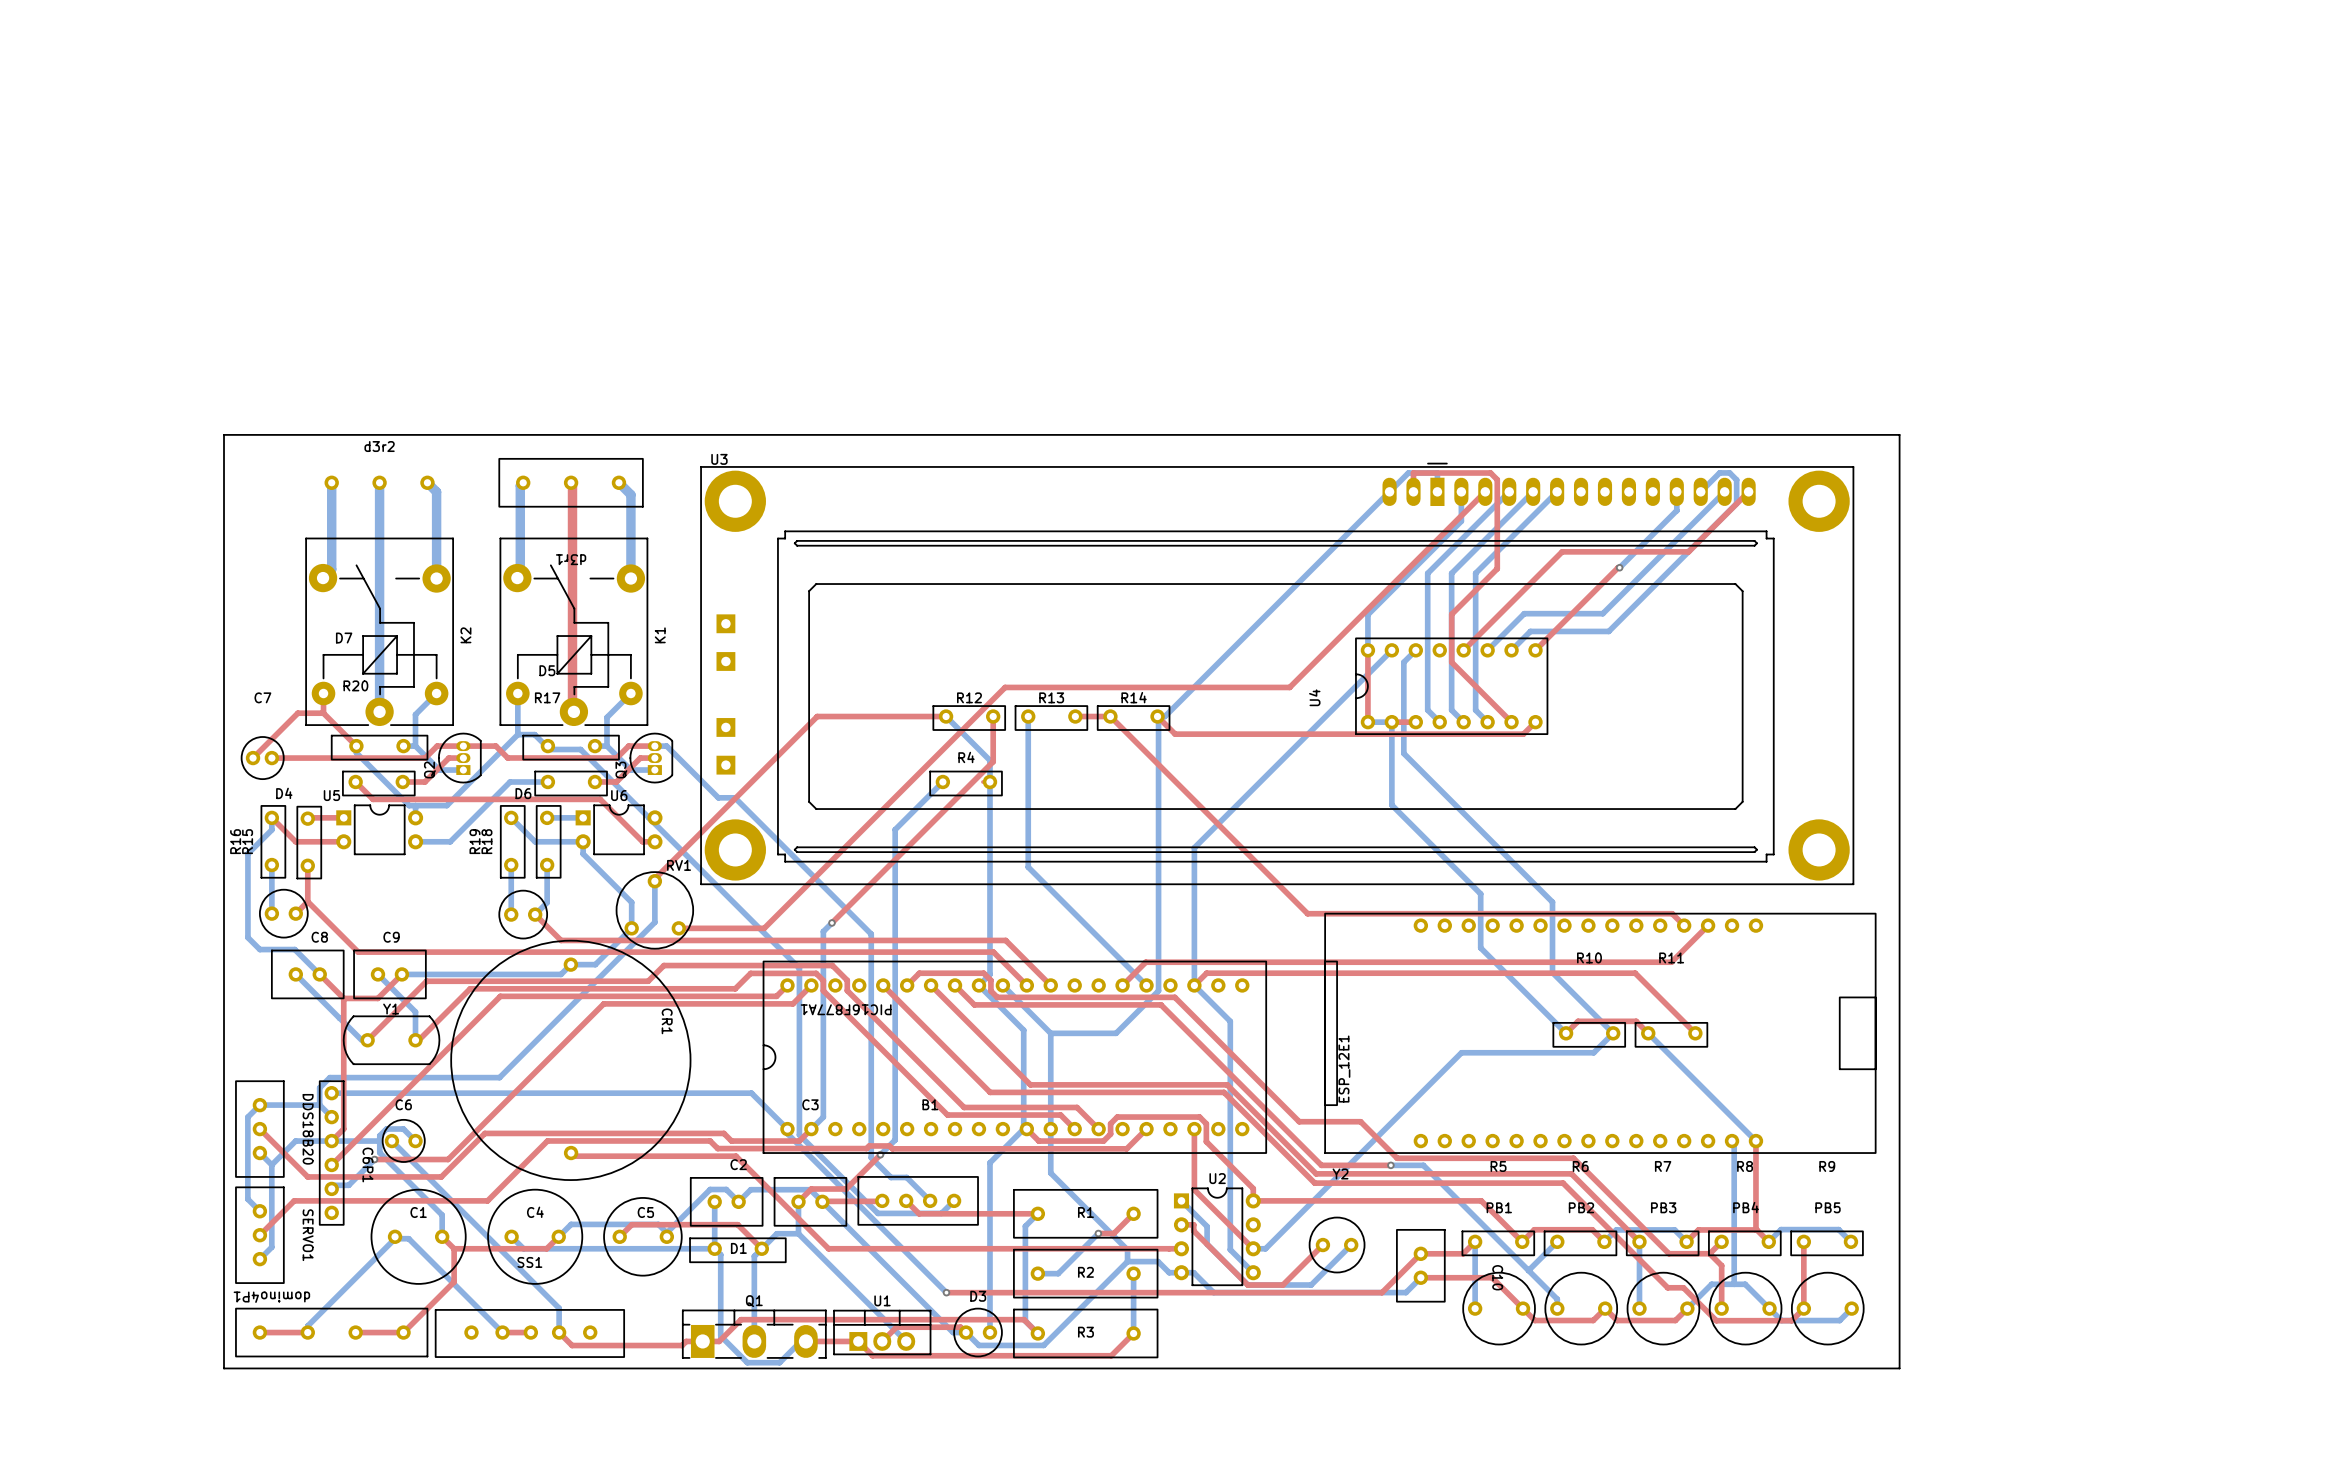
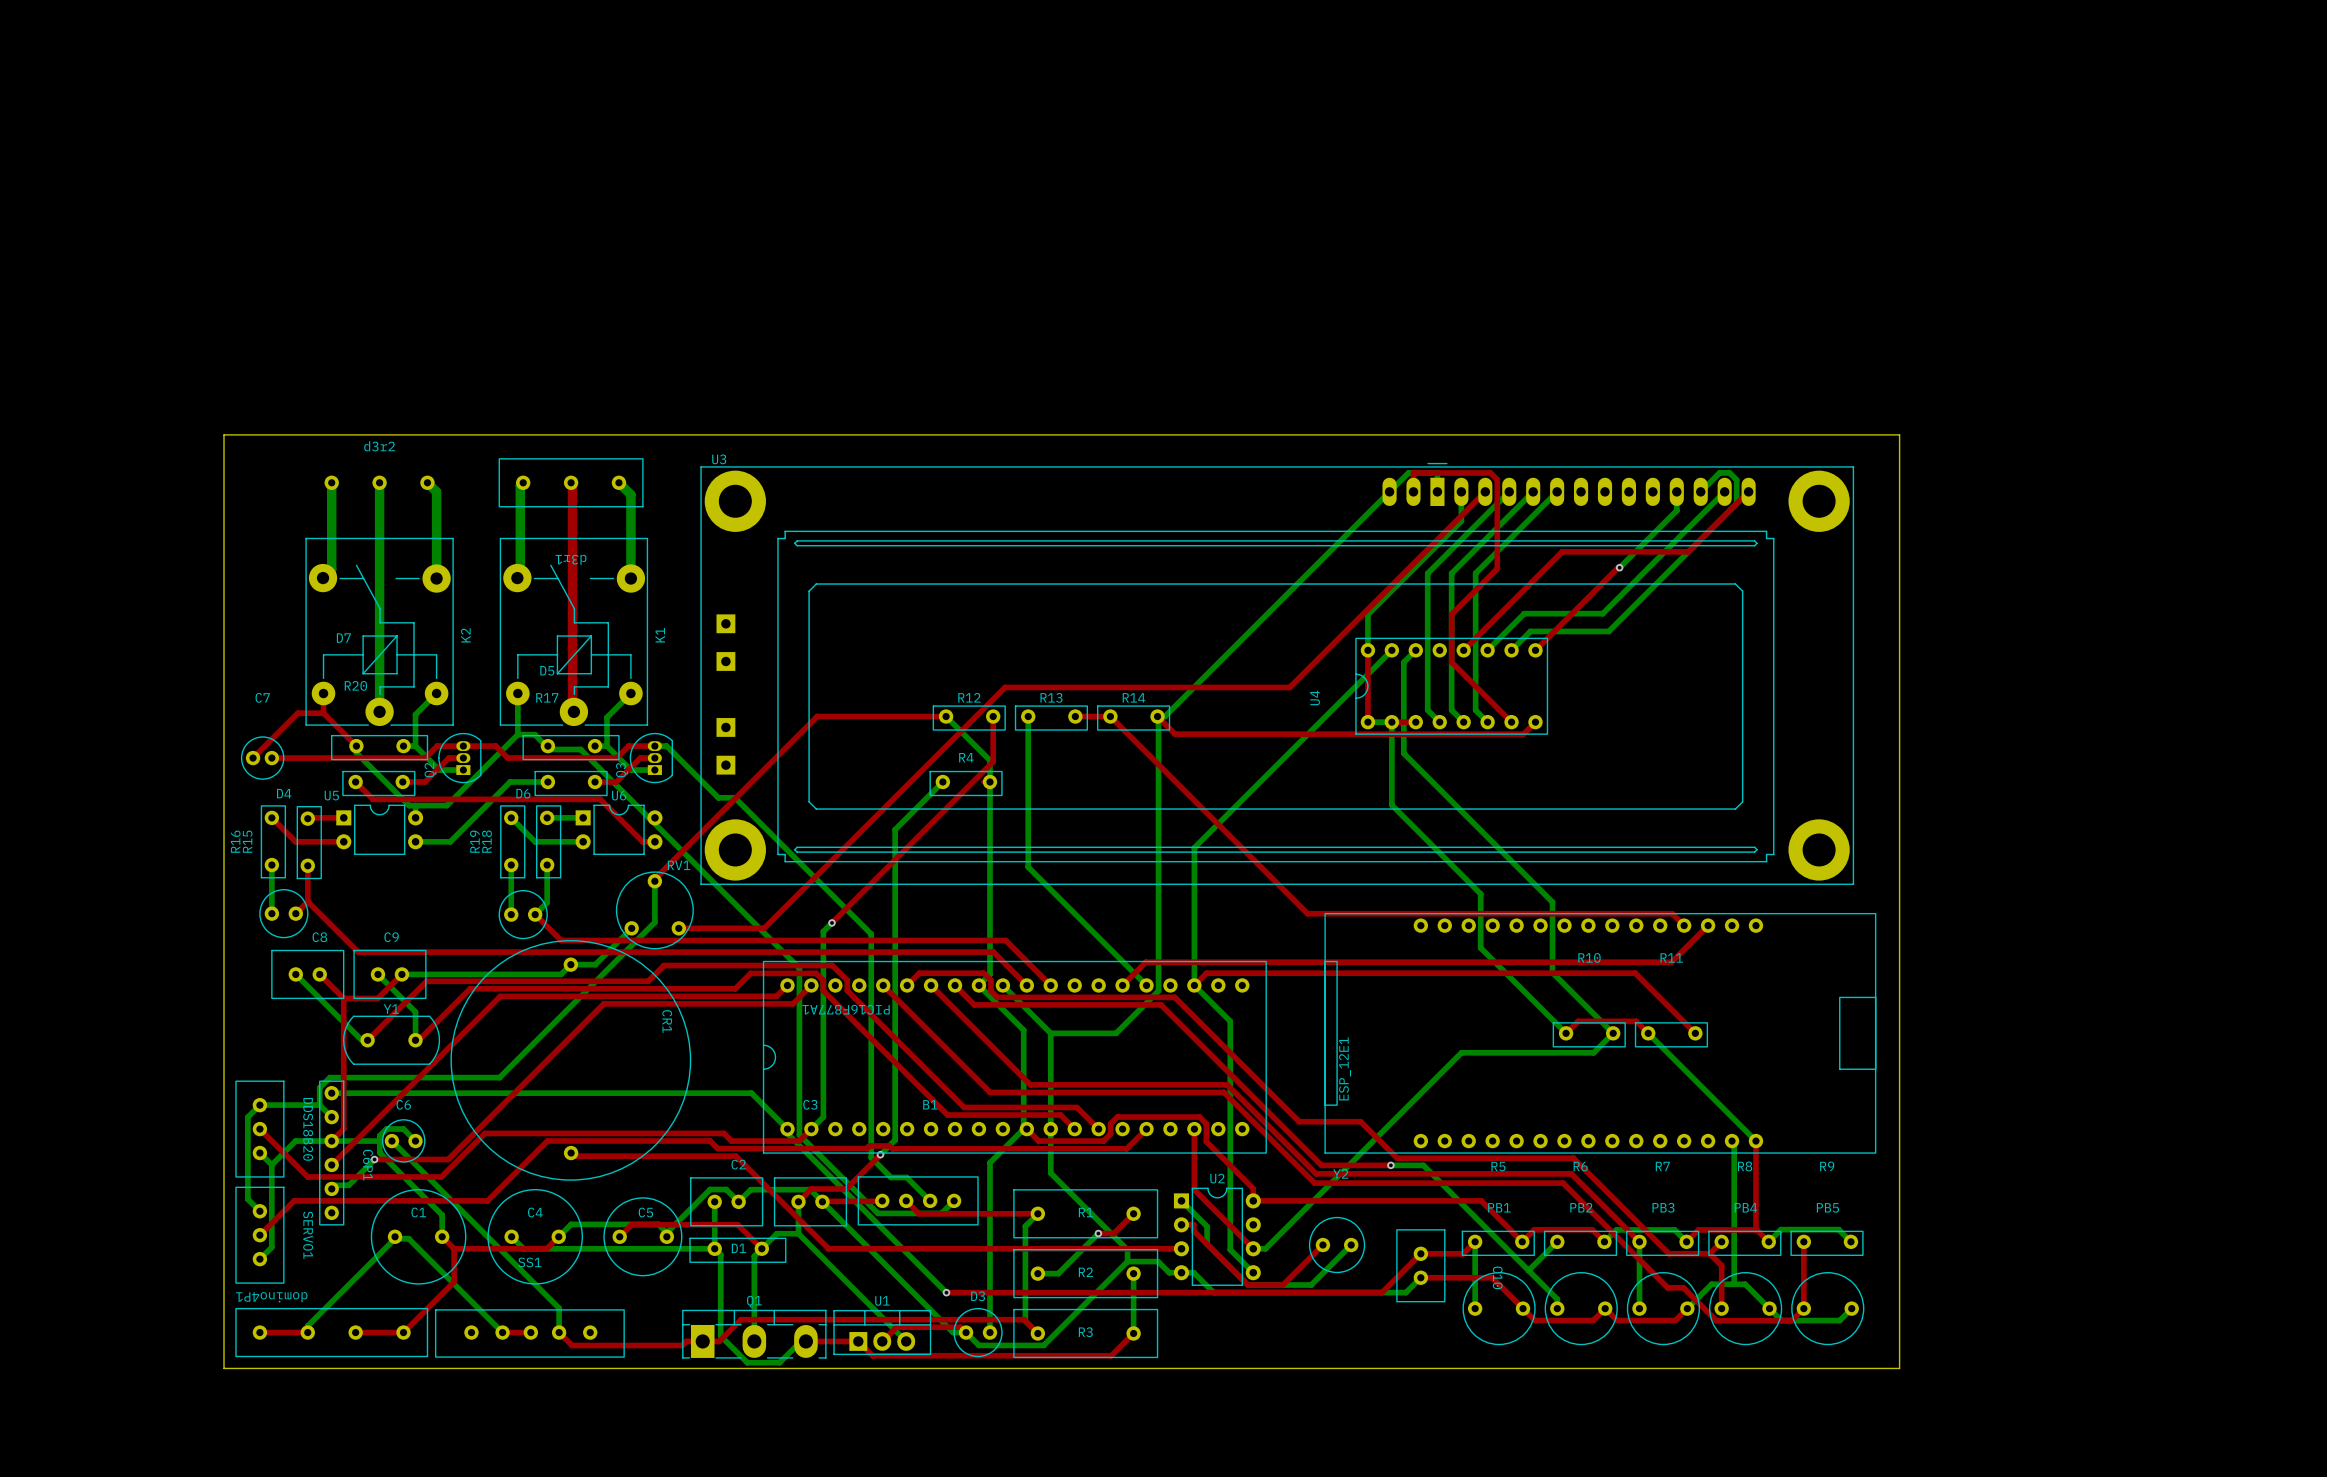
bottom track: (271, 817) (271, 829) (247, 853) (247, 937) (259, 949) (294, 949) (319, 974) -> none
bottom track: (583, 841) (583, 853) (631, 902) (631, 928) -> none

